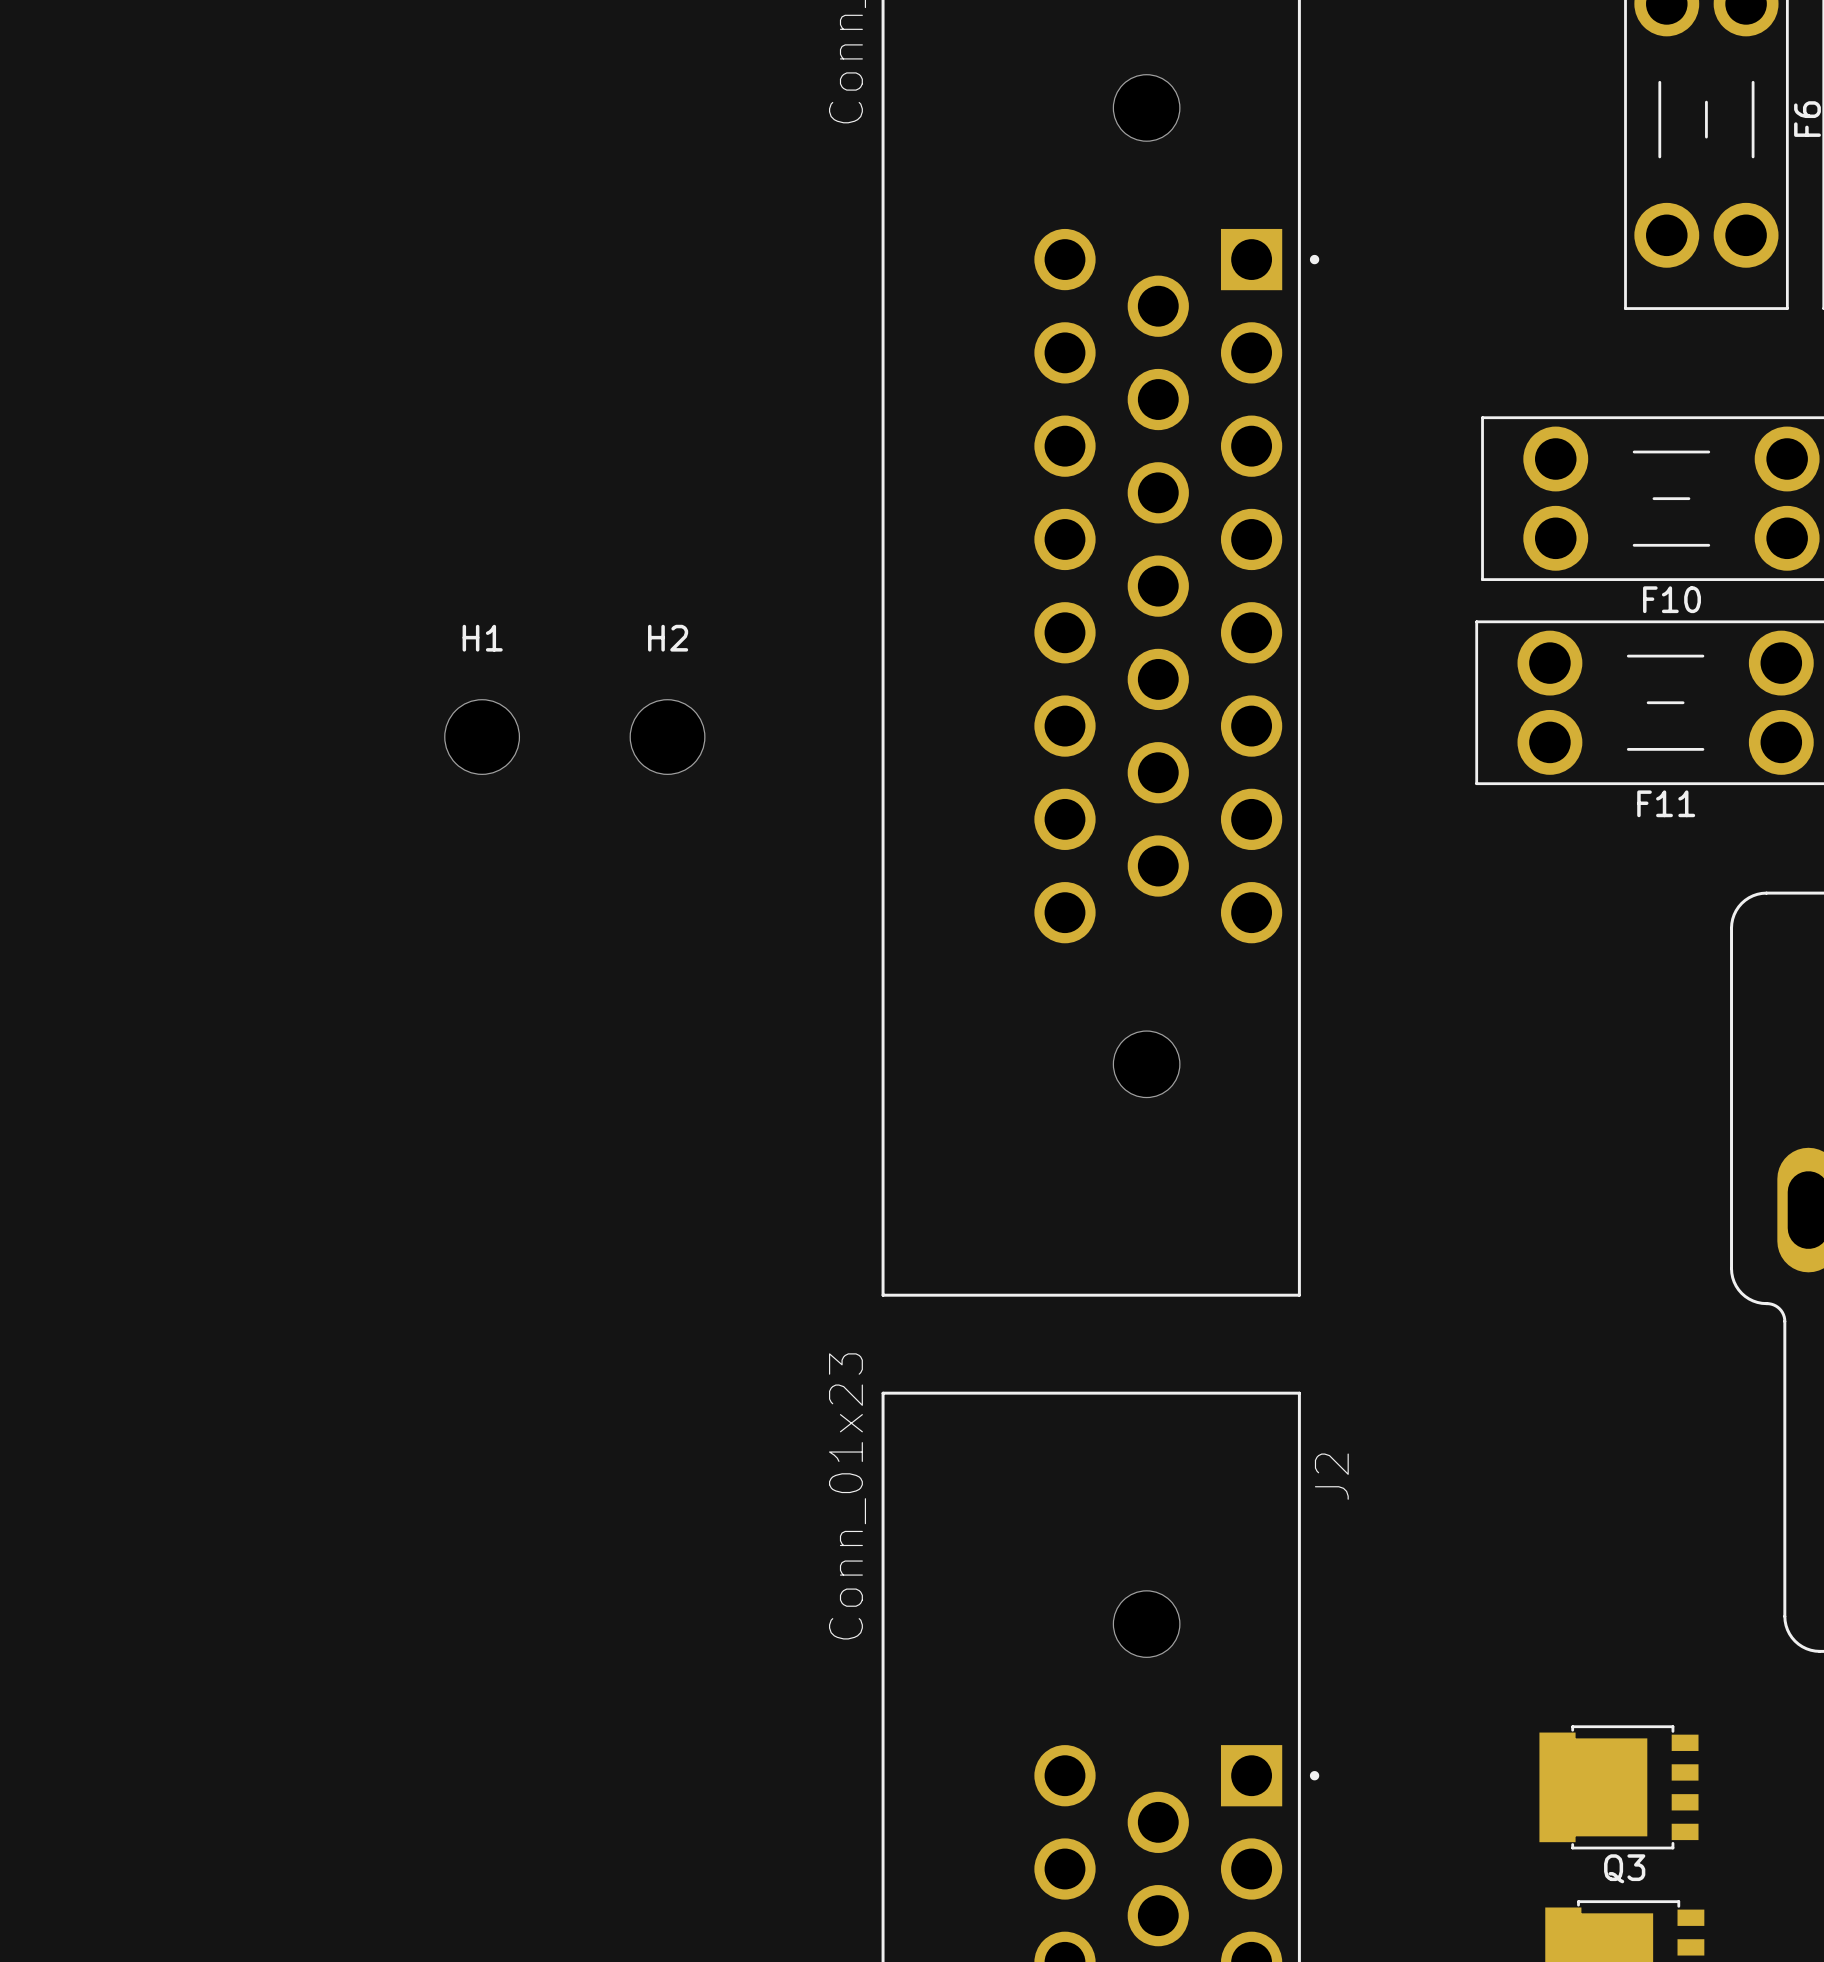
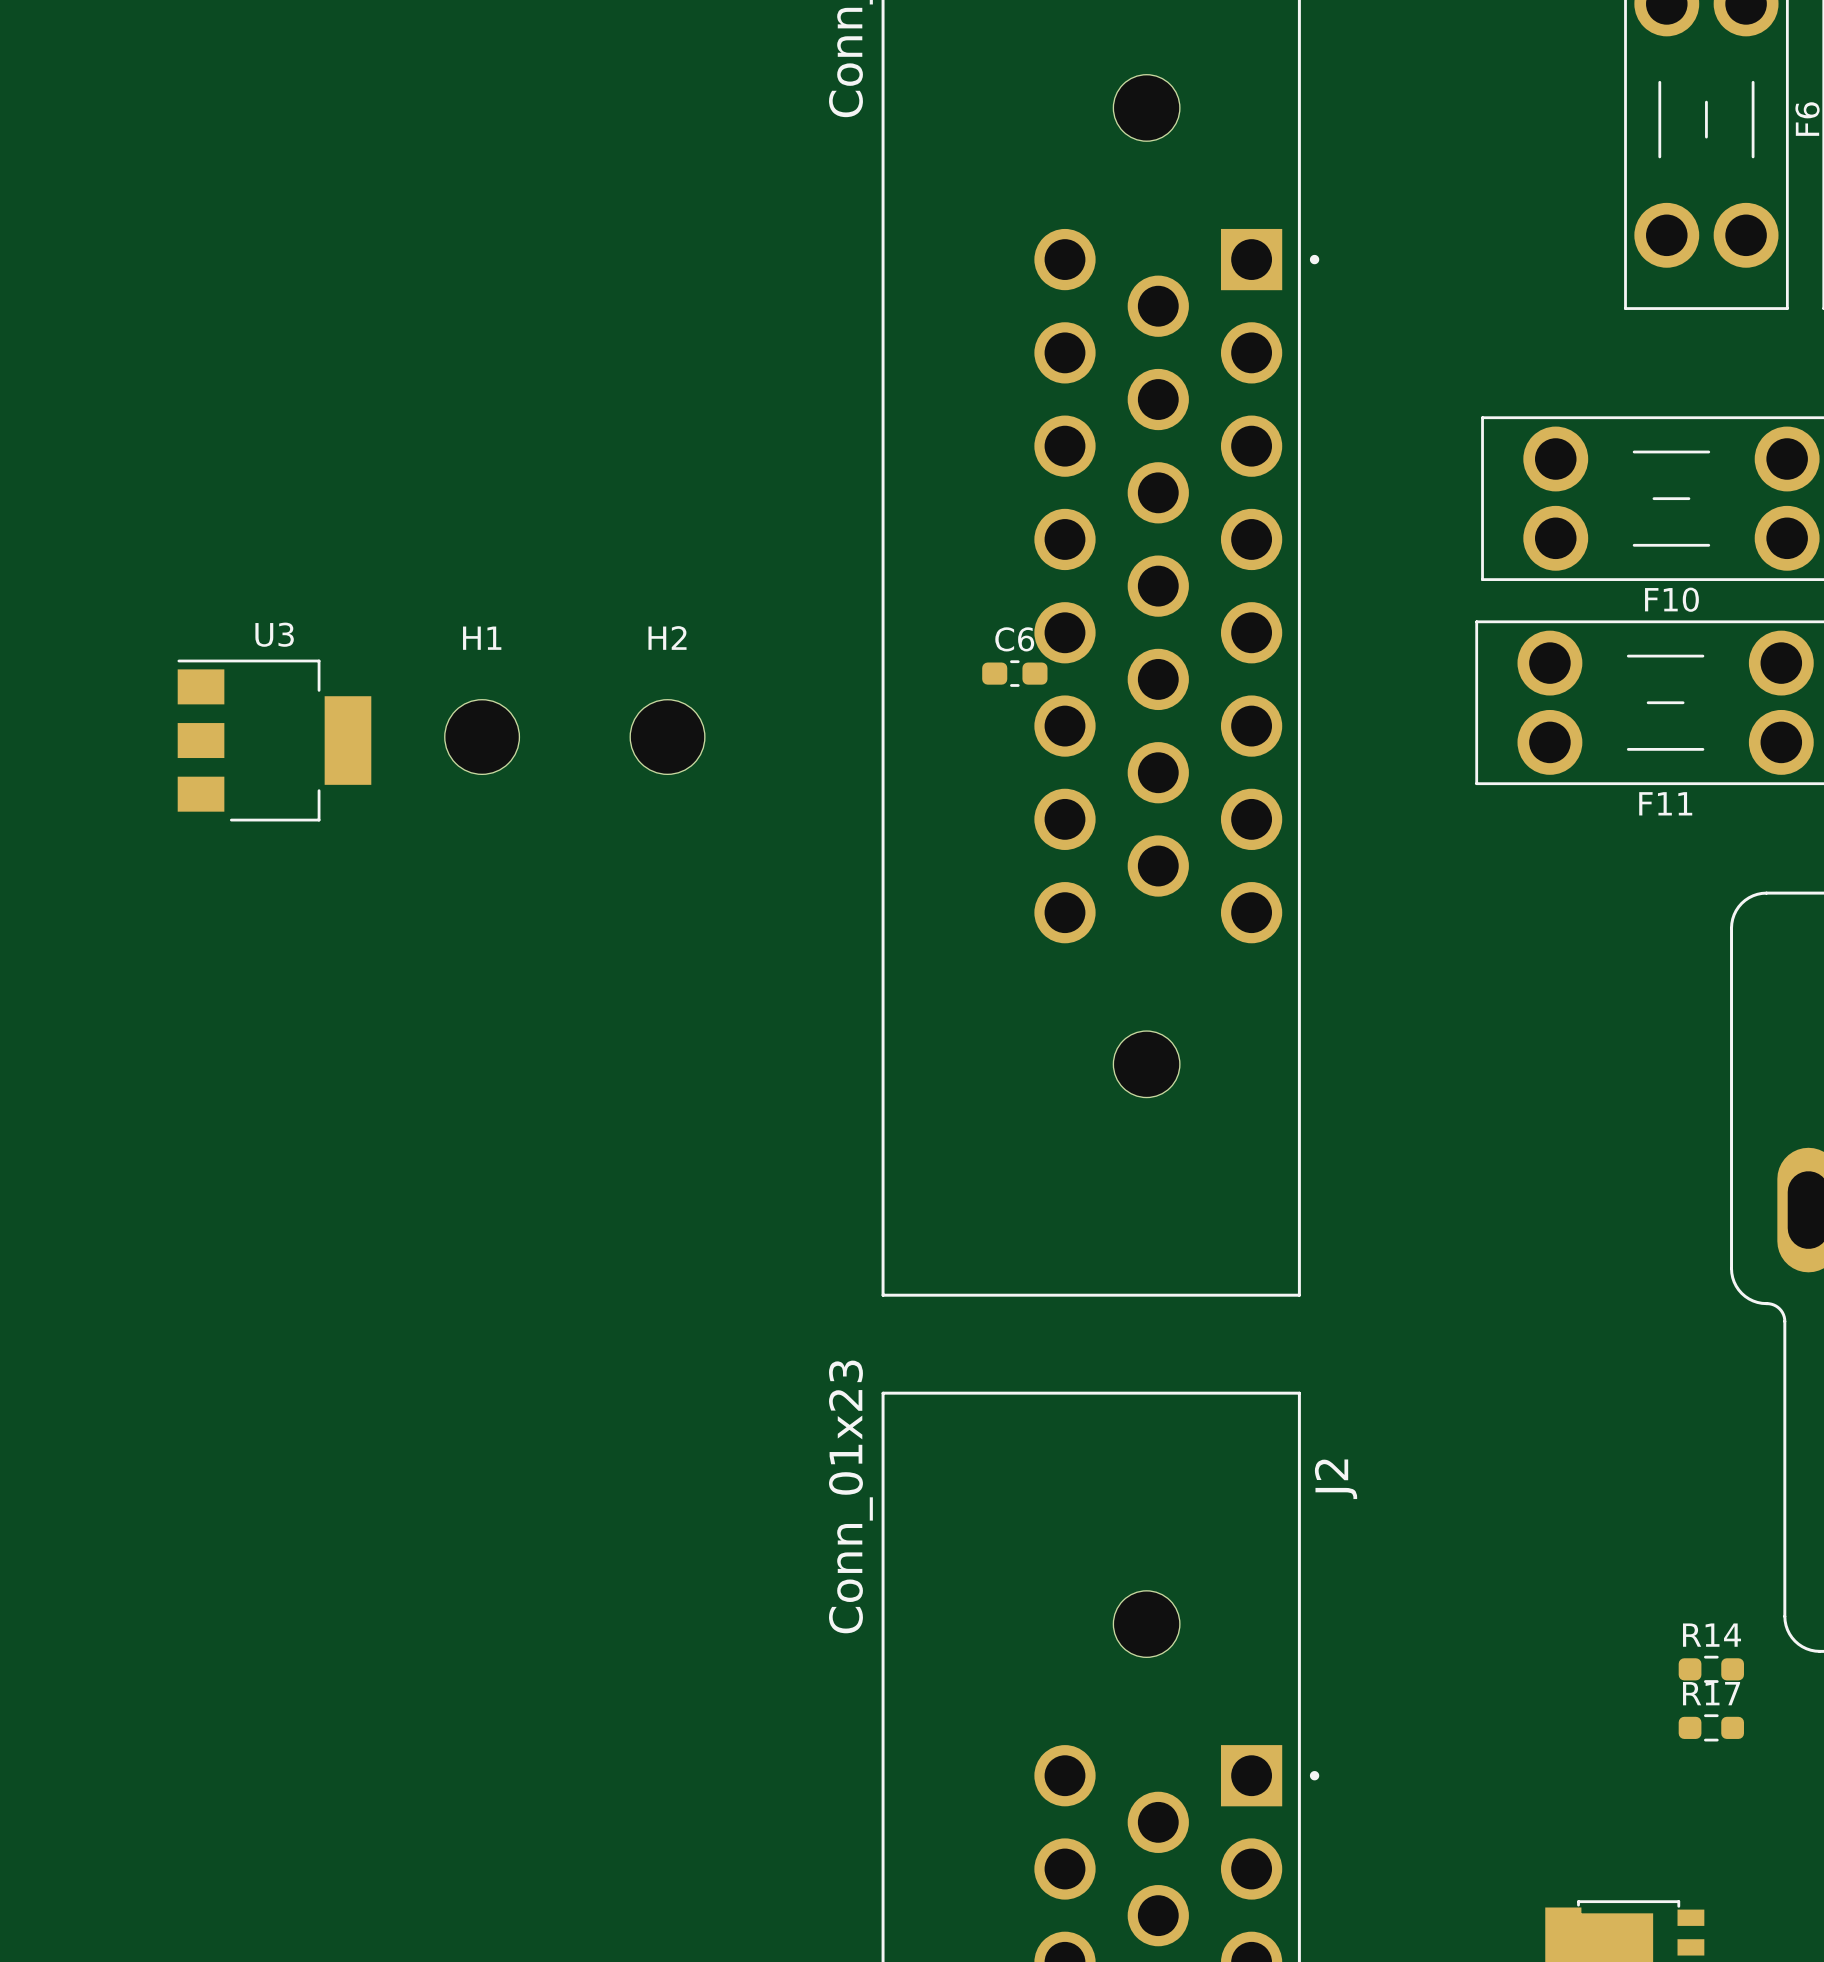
C6: none -> (1014, 673)
U3: none -> (274, 740)
R14: none -> (1711, 1669)
R17: none -> (1711, 1727)
Q3: (1618, 1787) -> none

